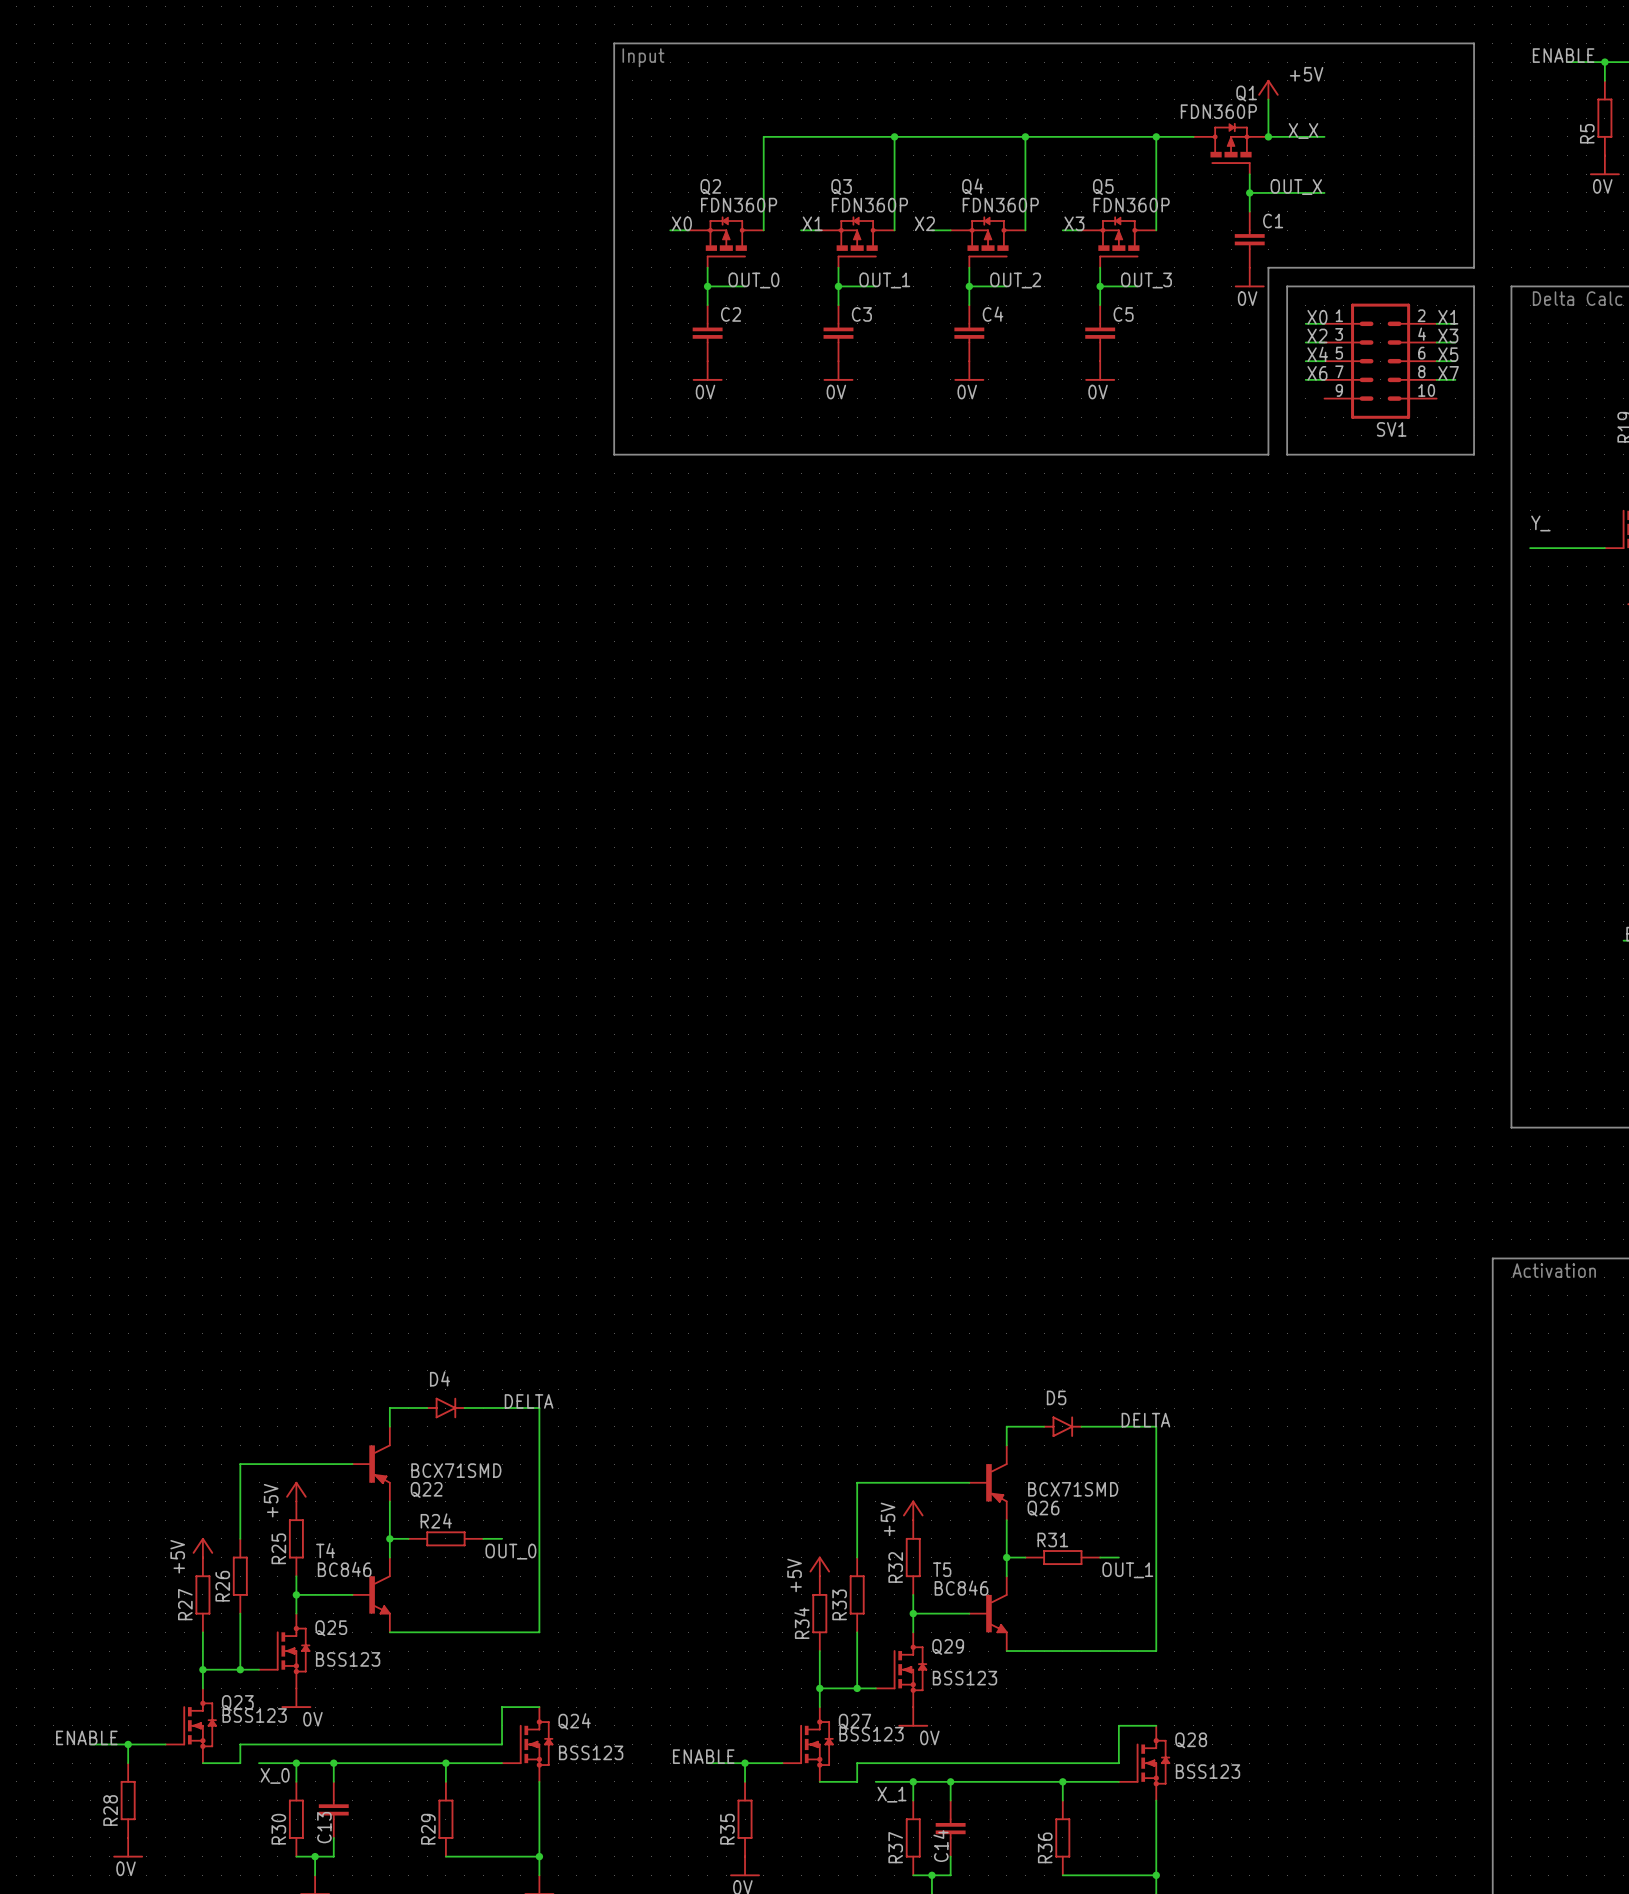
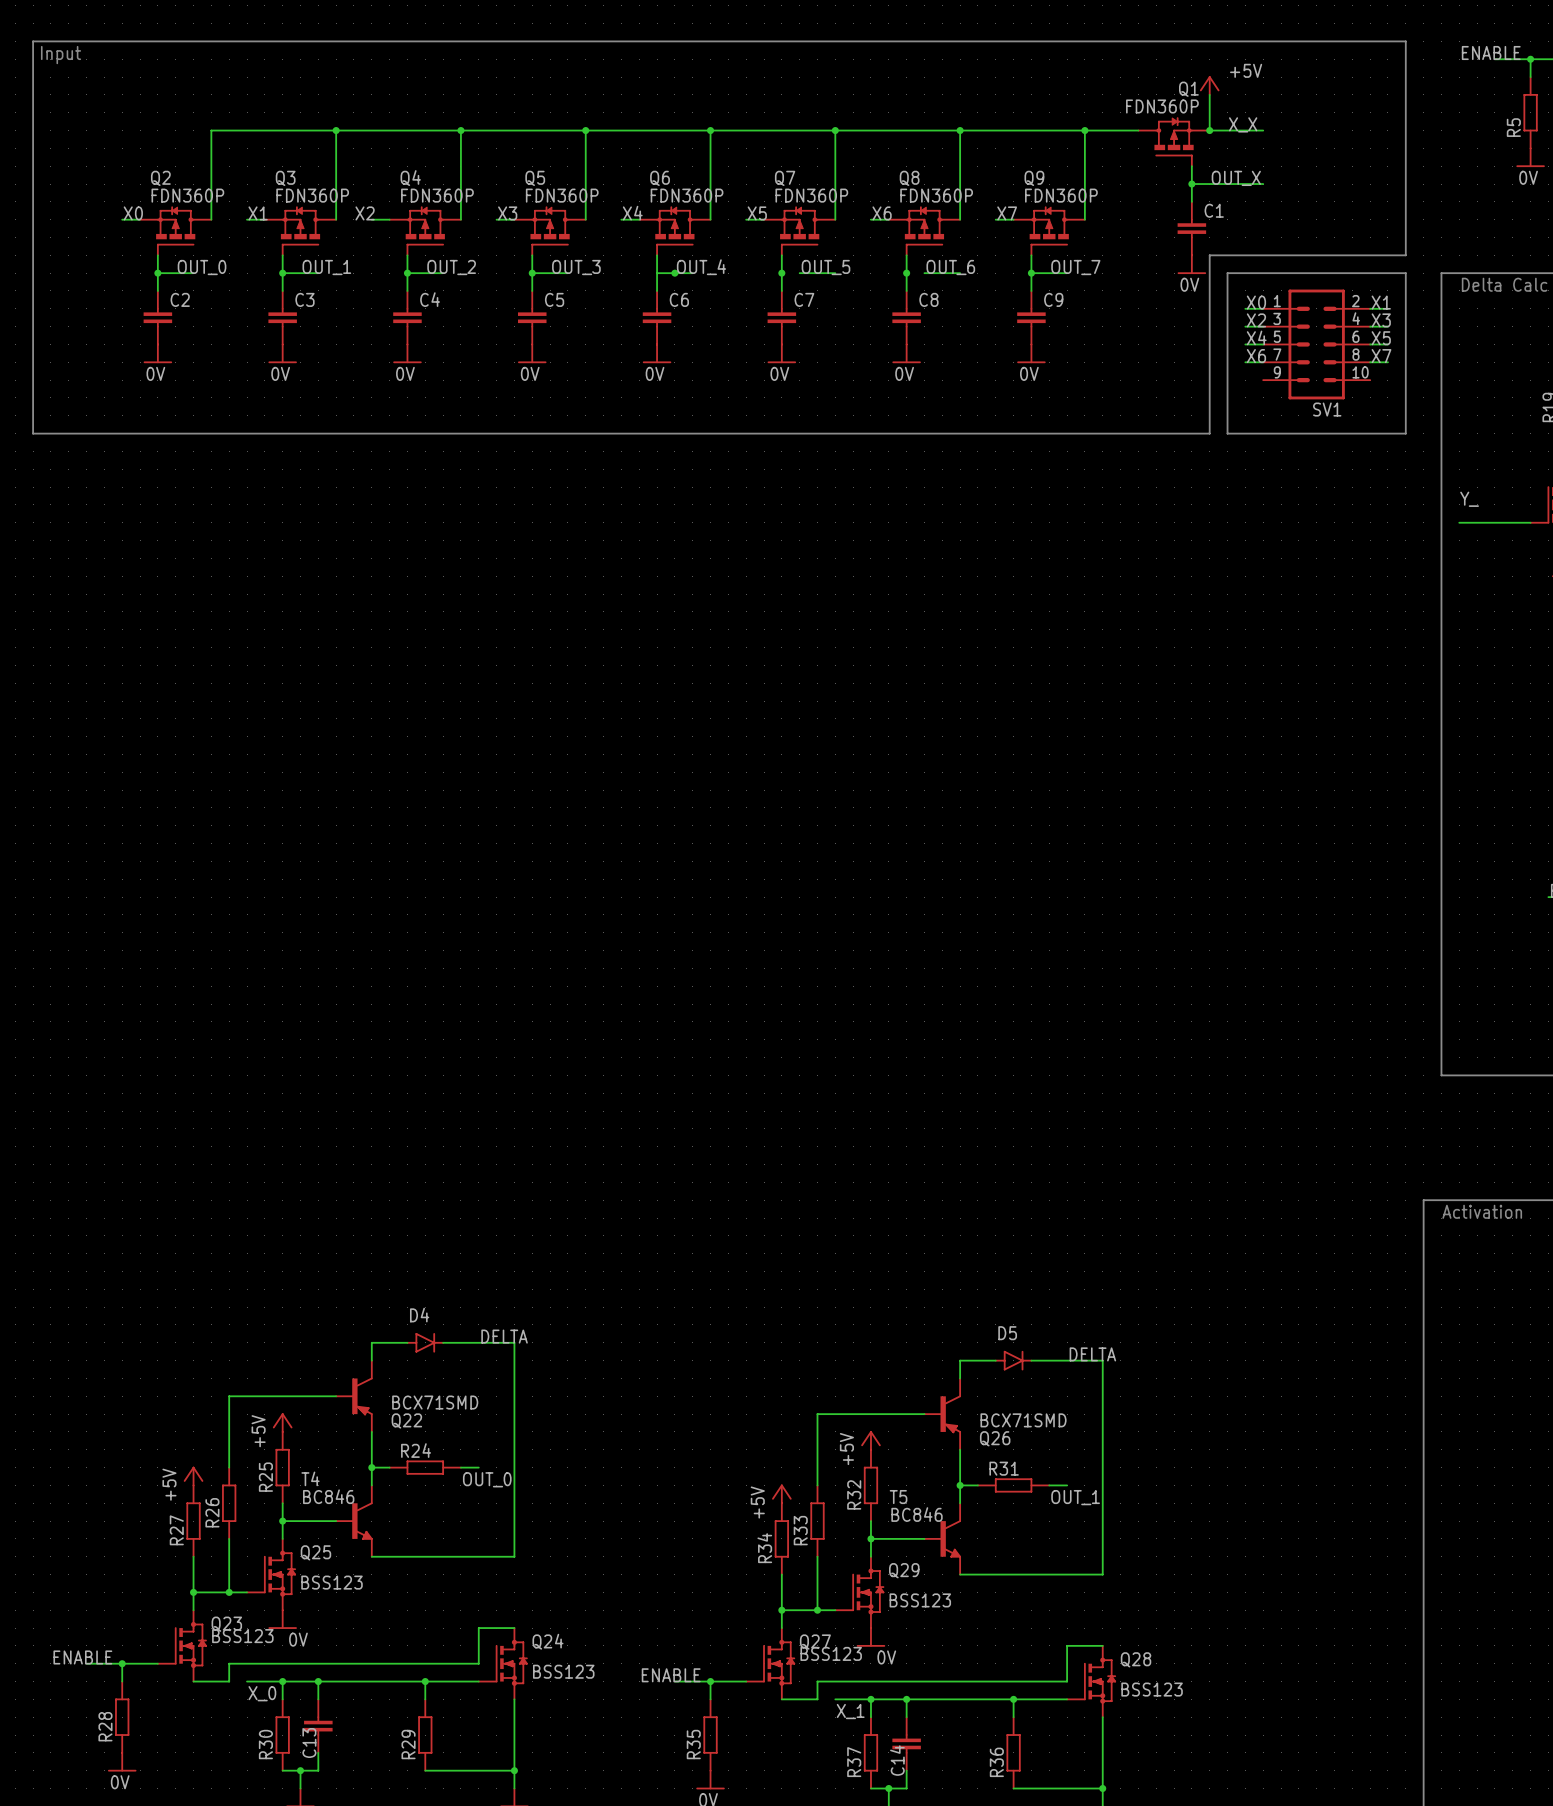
line: (614, 43) (614, 454) -> (585, 41) (33, 41) (33, 433) (585, 433)
text: none -> Input (61, 55)
text: Input (643, 57) -> none
wire: none -> (336, 130) (336, 219)
junction: none -> (336, 130)
wire: none -> (460, 130) (460, 219)
junction: none -> (460, 130)
junction: none -> (585, 130)
wire: none -> (710, 130) (710, 219)
junction: none -> (710, 130)
wire: (763, 136) (763, 230) -> (728, 130) (211, 130) (211, 219)
wire: (894, 136) (894, 230) -> (835, 130) (835, 219)
junction position: (894, 136) -> (835, 130)
wire: (1025, 136) (1025, 230) -> (960, 130) (960, 219)
junction position: (1025, 136) -> (960, 130)
wire: (1156, 136) (1156, 230) -> (1084, 130) (1084, 219)
junction position: (1156, 136) -> (1084, 130)
label: none -> X0 (133, 213)
label: none -> X1 (258, 213)
label: none -> X2 (365, 213)
label: none -> X3 (507, 213)
label: none -> X4 (632, 213)
label: X0 (681, 223) -> none
label: none -> X5 (757, 213)
label: X1 (812, 223) -> none
label: X2 (924, 223) -> X6 (882, 213)
label: none -> X7 (1007, 213)
label: X3 (1074, 223) -> none
wire: none -> (122, 219) (140, 219)
wire: none -> (247, 219) (264, 219)
wire: none -> (371, 219) (389, 219)
wire: none -> (496, 219) (514, 219)
Q6: none -> FDN360P (674, 231)
Q2 position: (726, 242) -> (175, 231)
Q7: none -> FDN360P (799, 231)
Q3 position: (857, 242) -> (300, 231)
Q8: none -> FDN360P (924, 231)
Q4 position: (988, 242) -> (425, 231)
Q9: none -> FDN360P (1049, 231)
Q5 position: (1118, 242) -> (550, 231)
wire: none -> (157, 255) (157, 290)
wire: none -> (282, 255) (282, 290)
wire: none -> (407, 255) (407, 290)
wire: none -> (532, 255) (532, 290)
wire: (707, 267) (707, 305) -> (657, 255) (657, 290)
wire: (838, 267) (838, 305) -> (781, 255) (781, 290)
wire: (969, 267) (969, 305) -> (906, 255) (906, 290)
wire: (1100, 267) (1100, 305) -> (1031, 255) (1031, 290)
label: none -> OUT_0 (202, 267)
label: none -> OUT_1 (326, 267)
label: none -> OUT_2 (451, 267)
label: none -> OUT_3 (576, 267)
label: OUT_0 (753, 280) -> OUT_4 (701, 267)
label: OUT_1 (884, 280) -> OUT_5 (825, 267)
label: OUT_2 (1015, 280) -> OUT_6 (950, 267)
label: OUT_3 (1146, 280) -> OUT_7 (1075, 267)
wire: none -> (157, 273) (193, 273)
junction: none -> (157, 273)
wire: none -> (282, 273) (318, 273)
junction: none -> (282, 273)
wire: none -> (407, 273) (443, 273)
junction: none -> (407, 273)
wire: none -> (532, 273) (567, 273)
junction: none -> (532, 273)
wire: (726, 286) (745, 286) -> (657, 273) (674, 273)
junction position: (838, 286) -> (781, 273)
junction position: (969, 286) -> (906, 273)
junction position: (1100, 286) -> (1031, 273)
wire: (1118, 286) (1137, 286) -> (1031, 273) (1049, 273)
C6: none -> (657, 317)
C2 position: (707, 333) -> (157, 317)
C7: none -> (781, 317)
C3 position: (838, 333) -> (282, 317)
C8: none -> (906, 317)
C4 position: (969, 333) -> (407, 317)
C9: none -> (1031, 317)
C5 position: (1100, 333) -> (532, 317)
power symbol: none -> 0V (157, 353)
power symbol: none -> 0V (282, 353)
power symbol: none -> 0V (407, 353)
power symbol: none -> 0V (532, 353)
power symbol position: 0V (707, 371) -> 0V (657, 353)
power symbol position: 0V (838, 371) -> 0V (781, 353)
power symbol position: 0V (969, 371) -> 0V (906, 353)
power symbol position: 0V (1100, 371) -> 0V (1031, 353)

